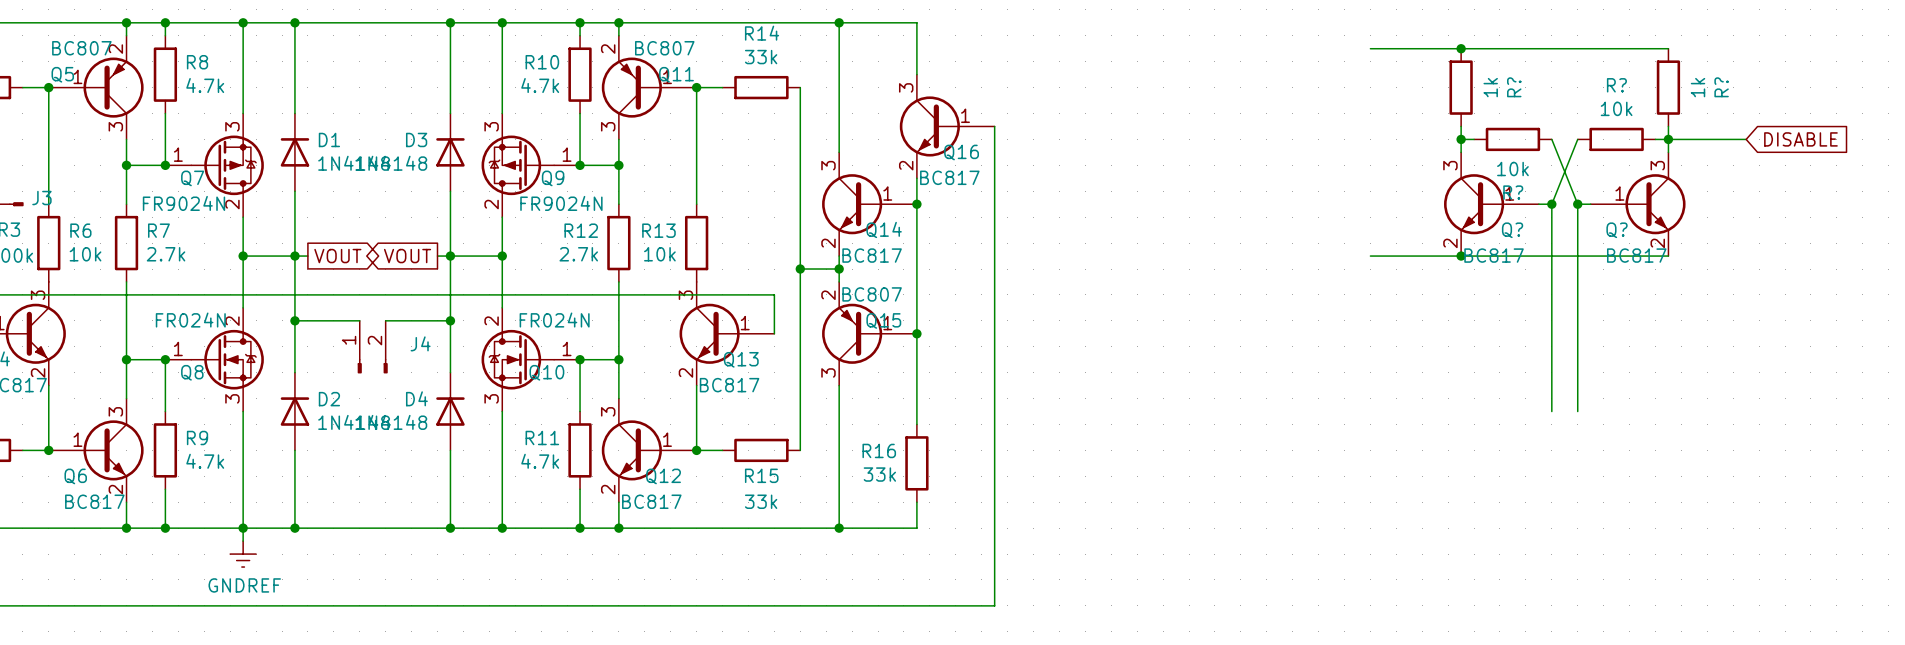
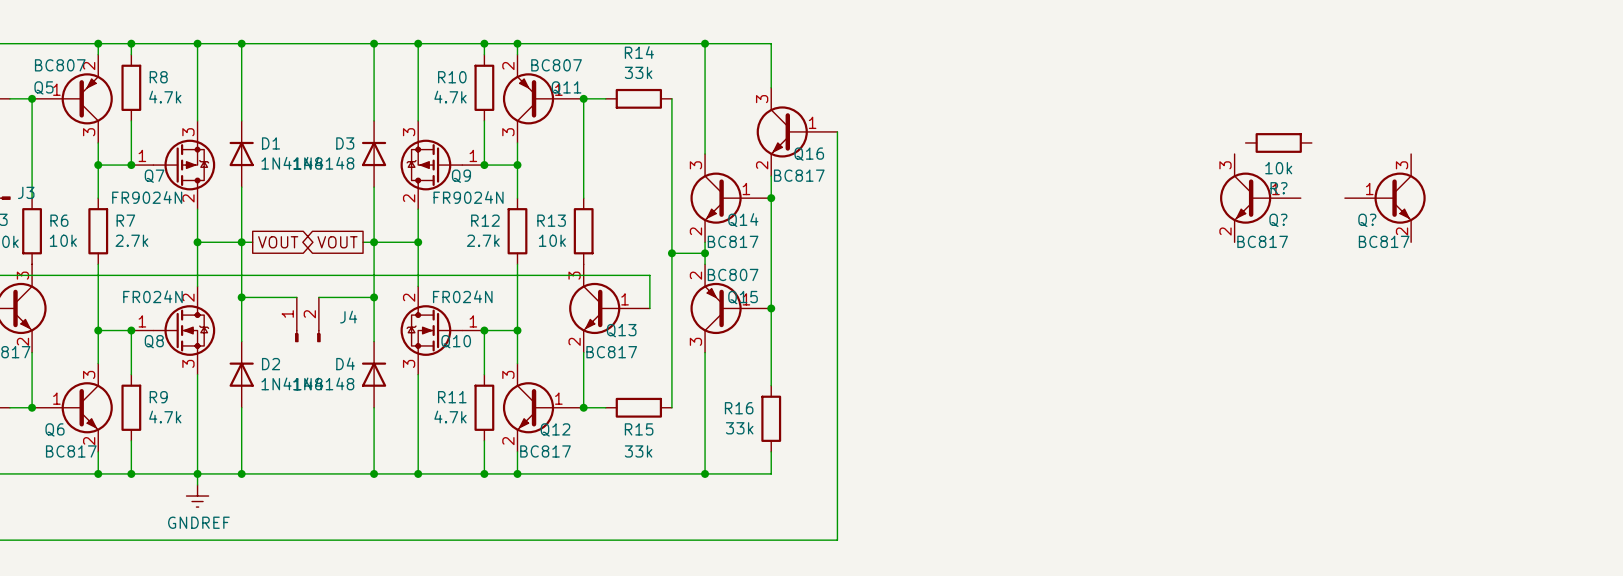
wire: (1370, 48) (1668, 48) -> none
junction: (1461, 48) -> none
R?: 1k (1461, 87) -> none
R?: 1k (1668, 87) -> none
wire: (1461, 126) (1461, 152) -> none
wire: (1668, 126) (1668, 152) -> none
wire: (1461, 139) (1474, 139) -> none
junction: (1461, 139) -> none
wire: (1551, 139) (1577, 204) -> none
wire: (1577, 139) (1551, 204) -> none
R?: 10k (1616, 139) -> none
wire: (1655, 139) (1746, 139) -> none
junction: (1668, 139) -> none
global label: DISABLE (1800, 139) -> none
wire: (1538, 204) (1551, 204) -> none
wire: (1551, 204) (1551, 411) -> none
junction: (1551, 204) -> none
wire: (1577, 204) (1577, 411) -> none
wire: (1577, 204) (1590, 204) -> none
junction: (1577, 204) -> none
wire: (1370, 256) (1668, 256) -> none
junction: (1461, 256) -> none

